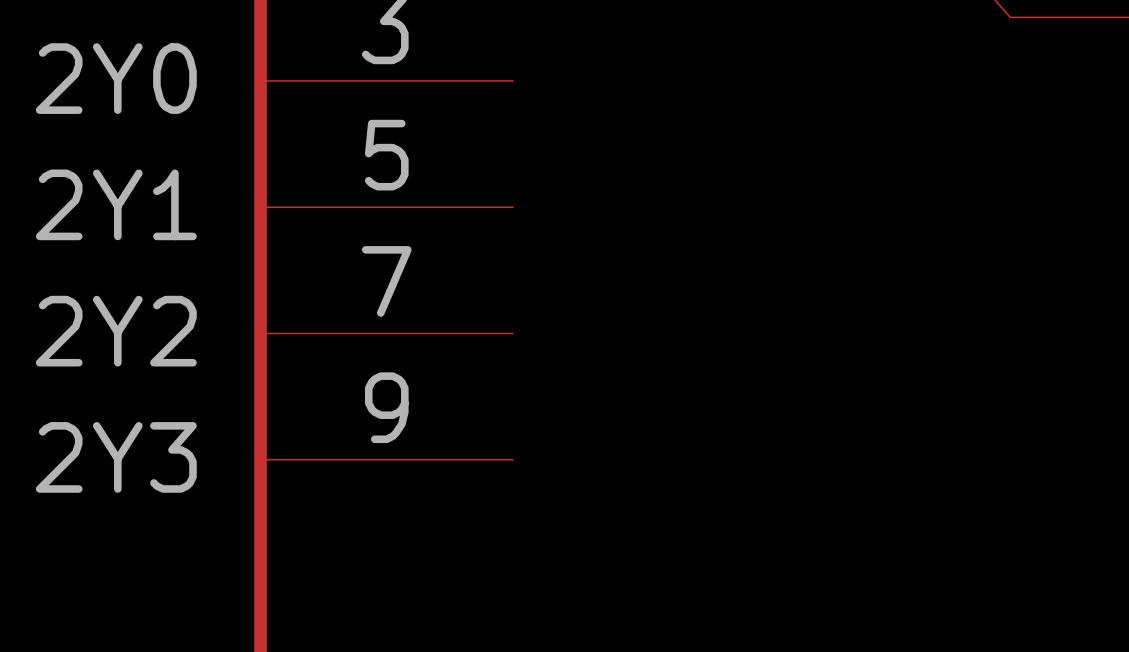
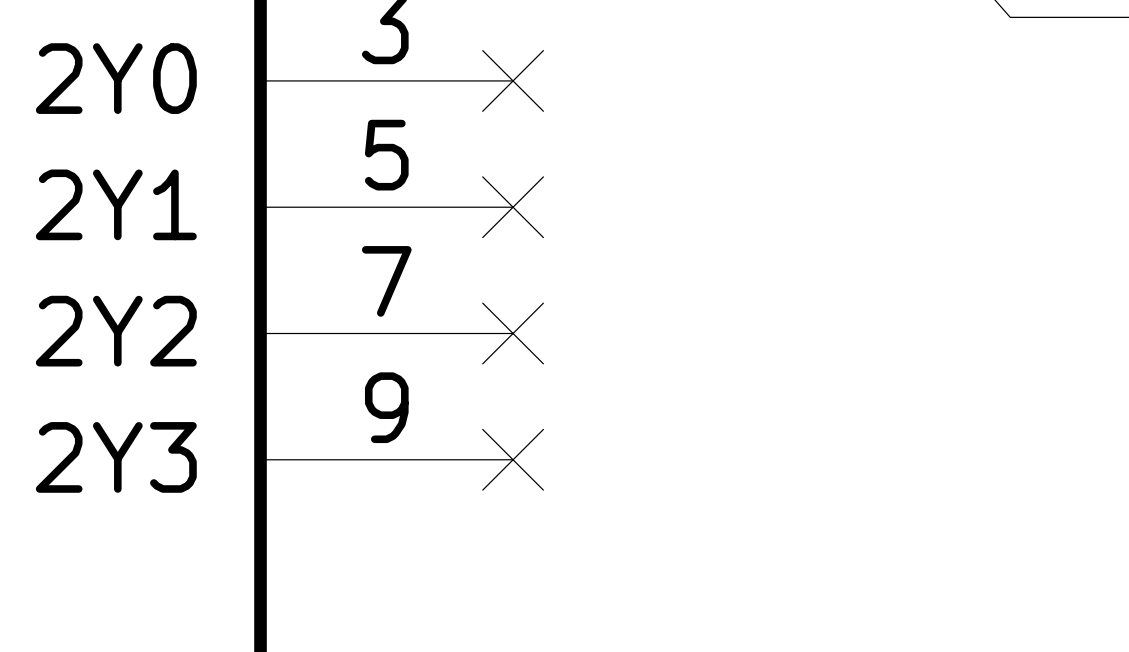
no-connect mark: none -> (513, 80)
no-connect mark: none -> (513, 207)
no-connect mark: none -> (513, 333)
no-connect mark: none -> (513, 459)

